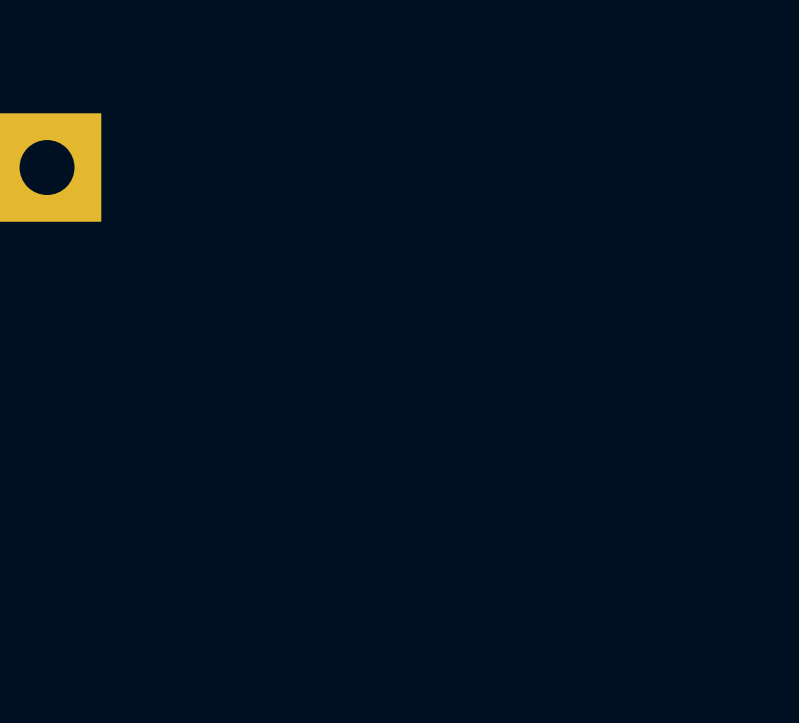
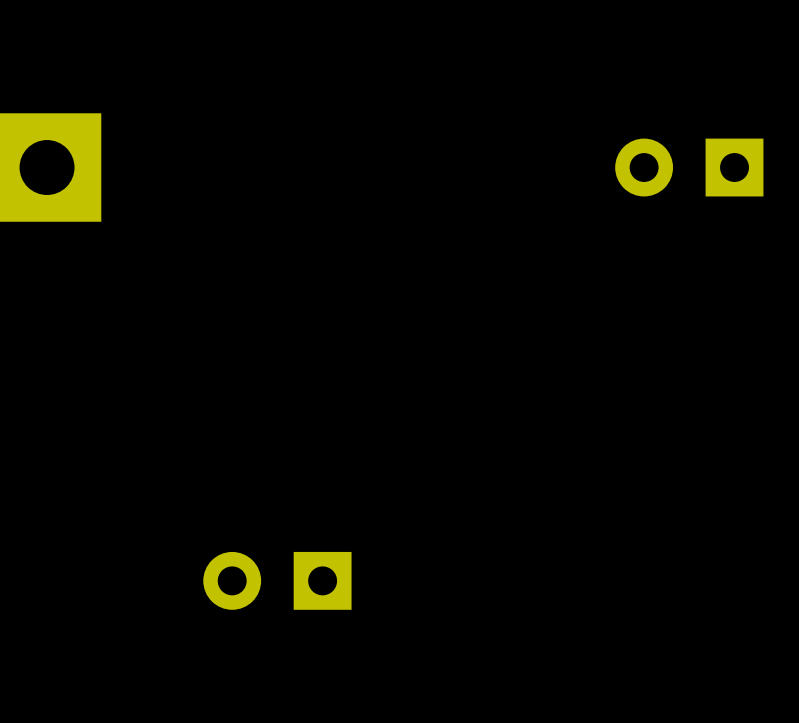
part: none -> (689, 167)
part: none -> (277, 580)

